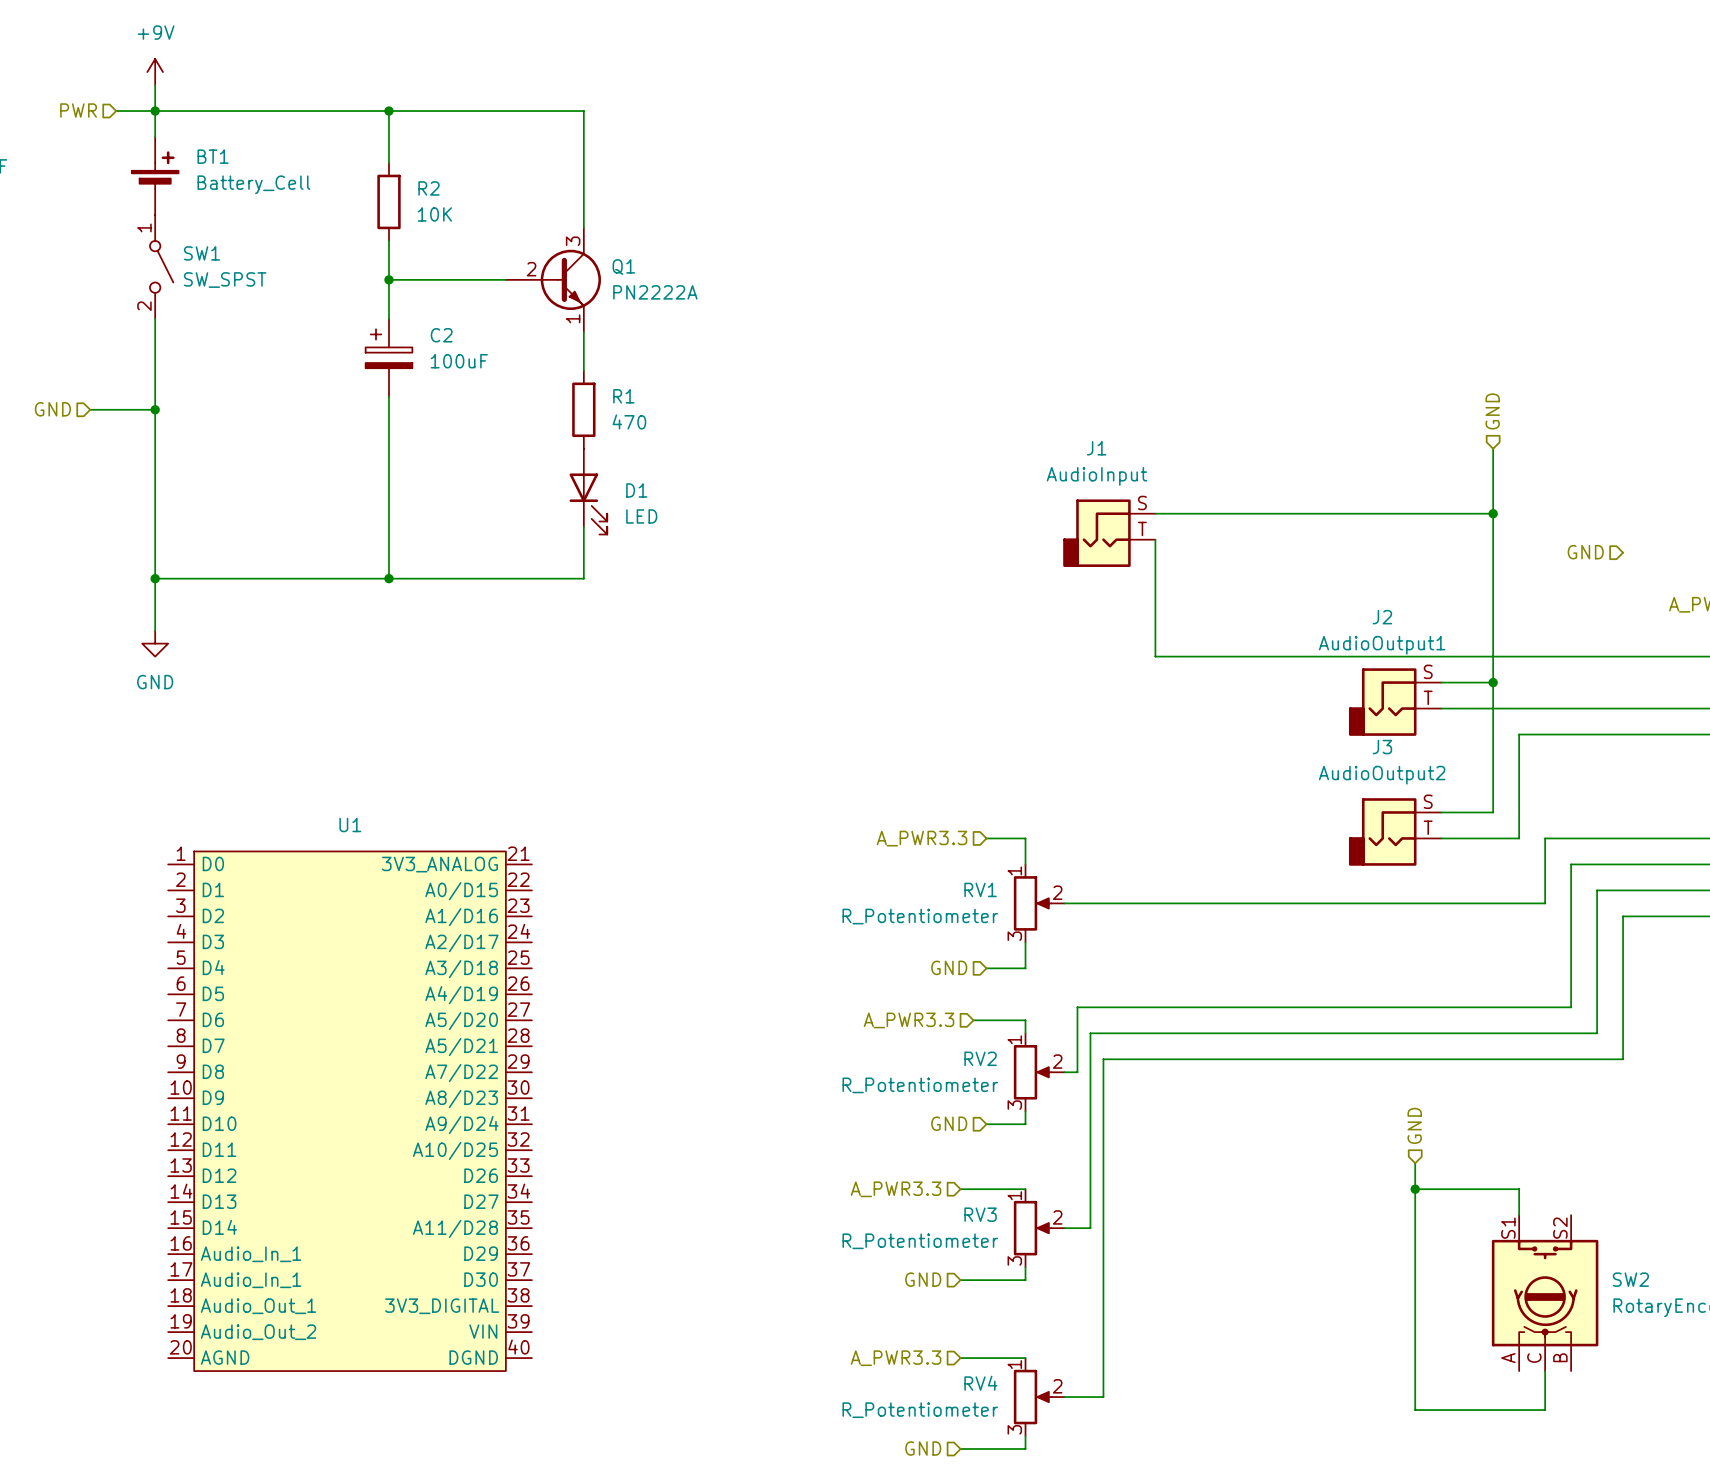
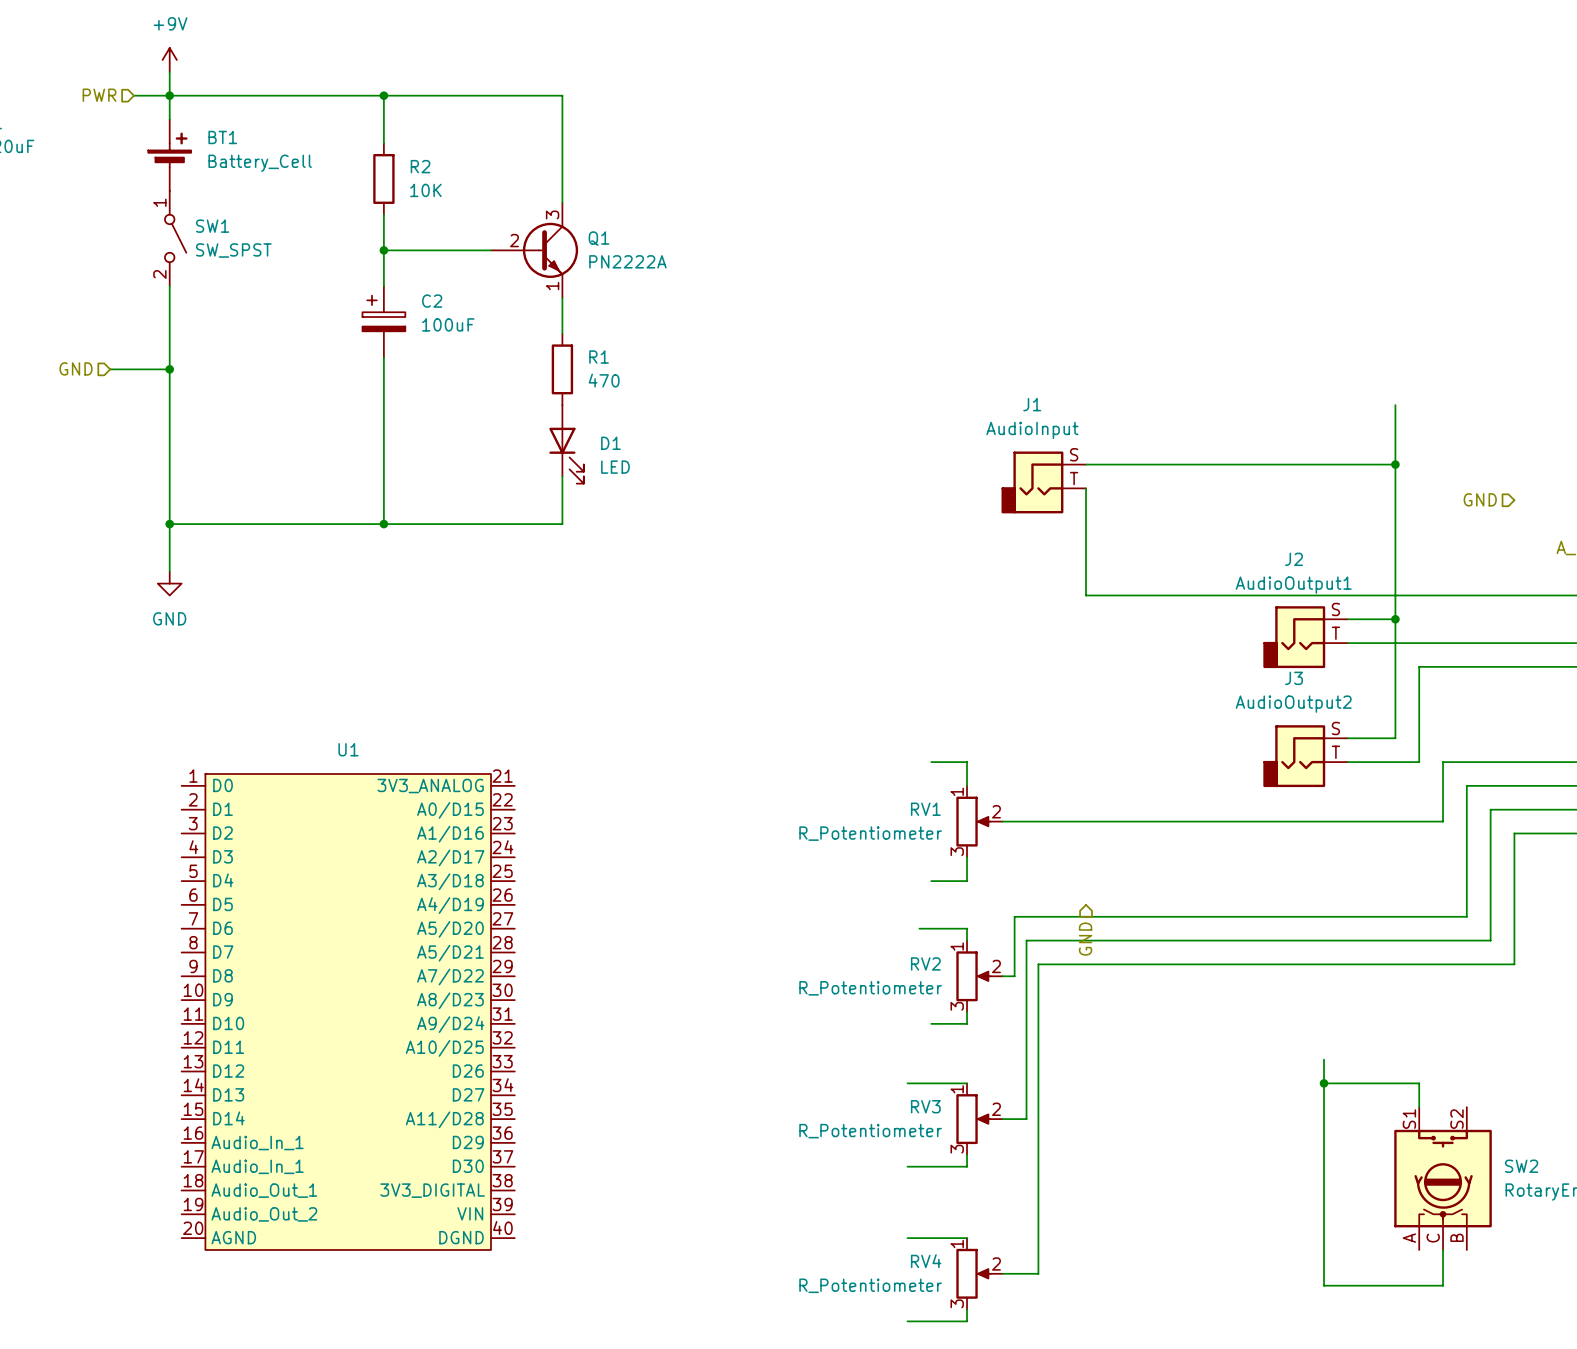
hierarchical label: GND (1492, 411) -> none
hierarchical label: A_PWR3.3 (922, 838) -> none
hierarchical label: GND (949, 967) -> none
hierarchical label: A_PWR3.3 (909, 1020) -> none
hierarchical label: none -> GND (1085, 939)
hierarchical label: GND (949, 1123) -> none
hierarchical label: GND (1414, 1125) -> none
hierarchical label: A_PWR3.3 (896, 1189) -> none
hierarchical label: GND (923, 1279) -> none
hierarchical label: A_PWR3.3 (896, 1358) -> none
hierarchical label: GND (923, 1448) -> none

